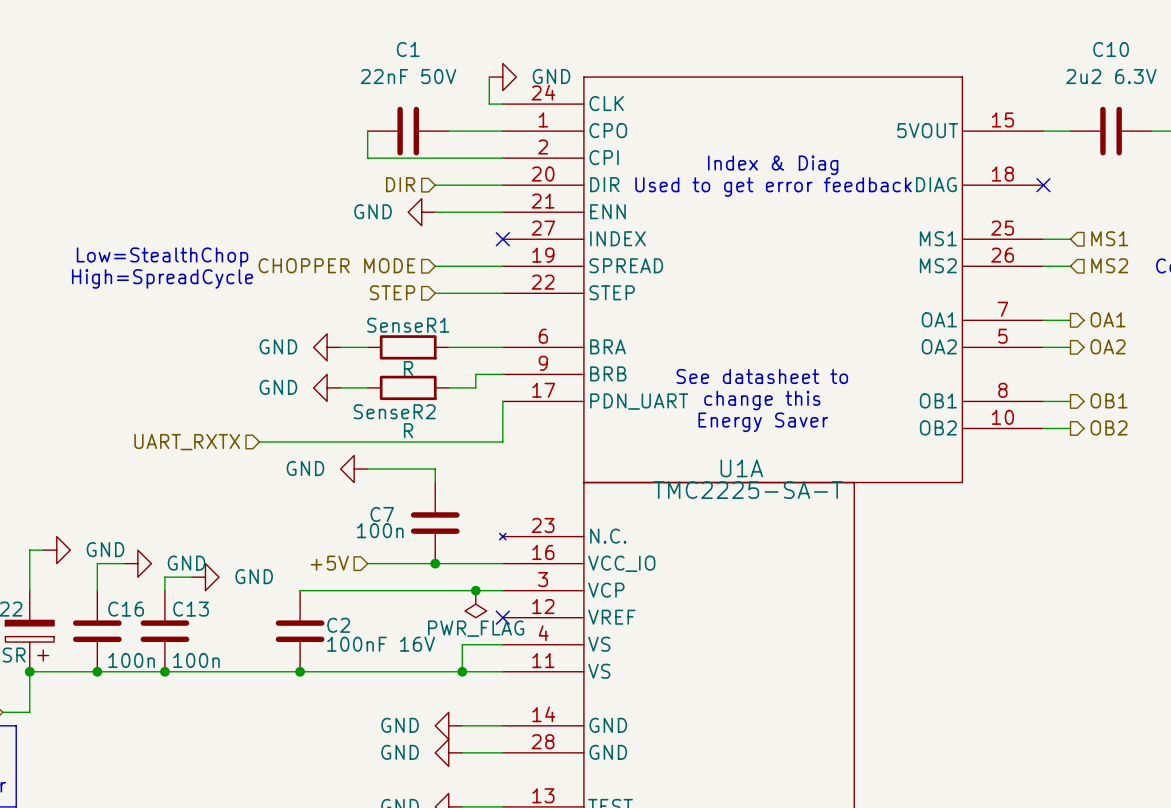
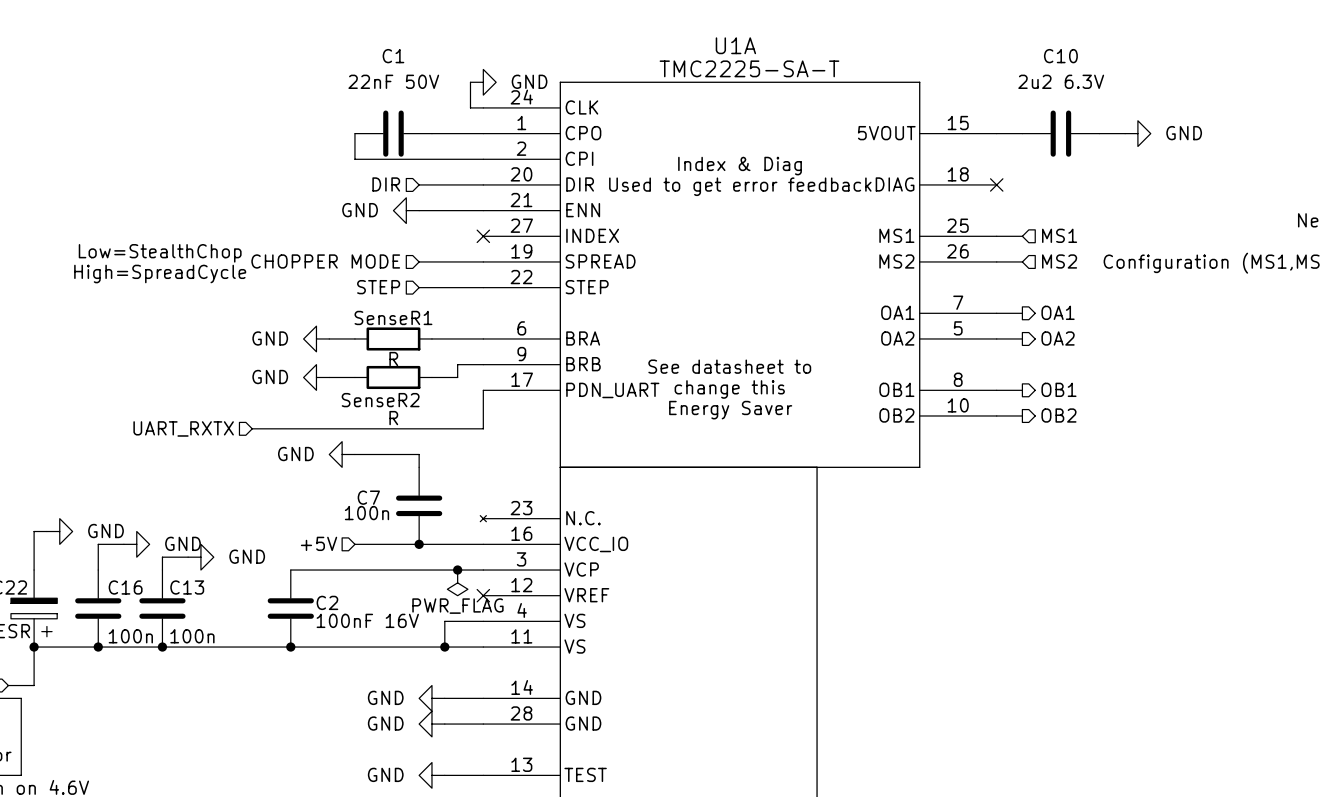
U1A name position: U1A (741, 468) -> U1A (735, 45)
U1A value position: TMC2225-SA-T (747, 490) -> TMC2225-SA-T (749, 68)

